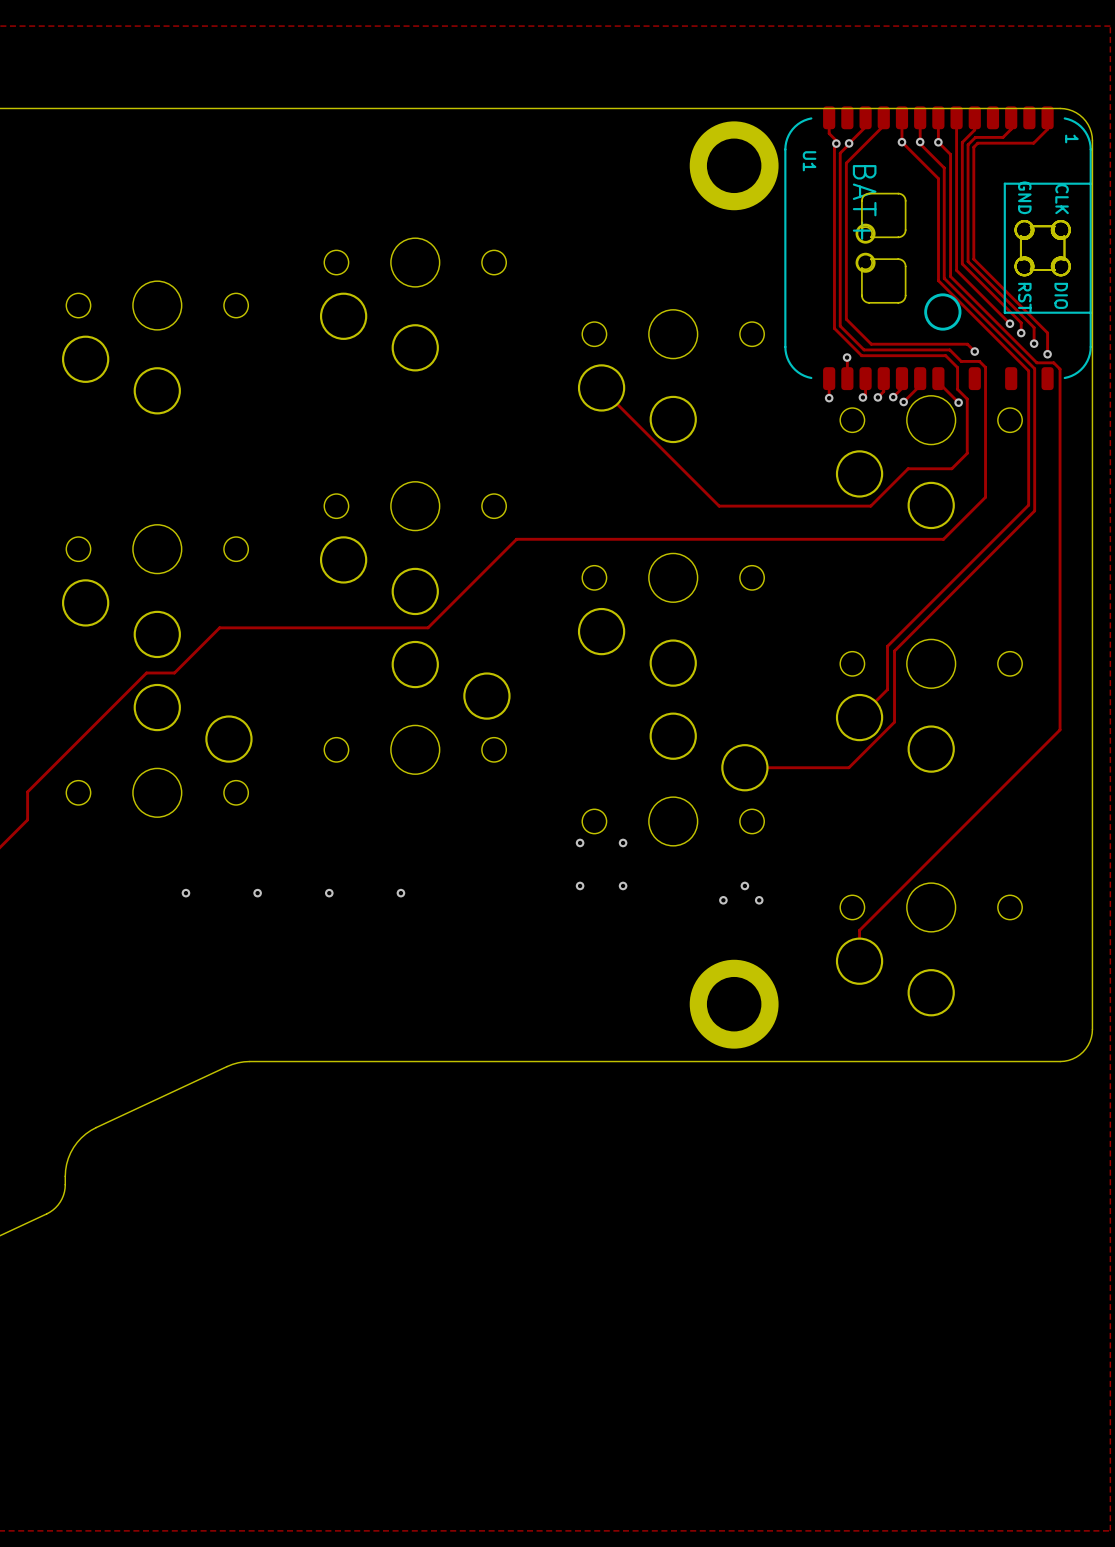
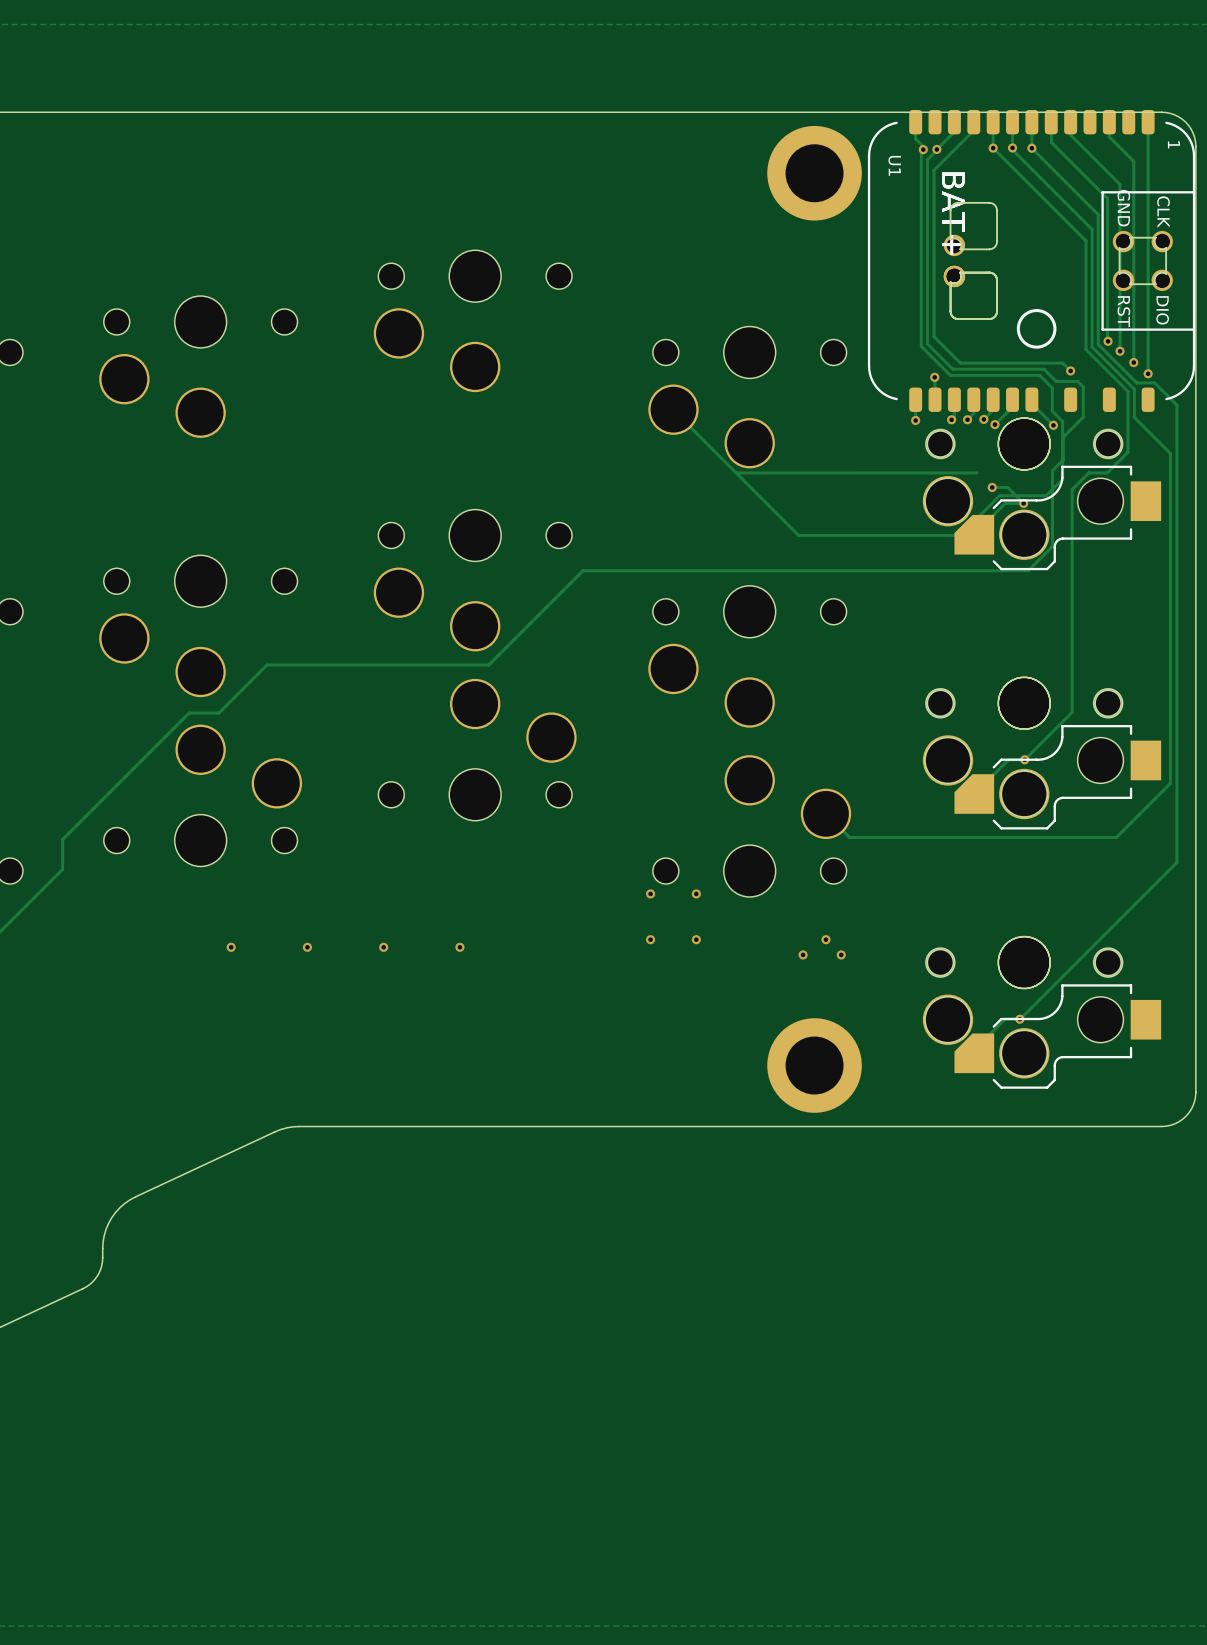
U1 footprint: [784, 106, 1092, 391] -> [867, 109, 1196, 412]
track: (956, 117) (956, 270) (1009, 323) -> (1051, 122) (1051, 142) (1107, 198) (1107, 340)
track: (974, 129) (962, 142) (962, 263) (1021, 322) -> (1070, 135) (1120, 184) (1120, 340)
track: (1011, 129) (1003, 137) (975, 137) (968, 144) (968, 261) (1034, 327) -> (1109, 134) (1109, 136) (1133, 161) (1133, 345)
track: (1047, 129) (1033, 143) (977, 143) (973, 147) (973, 259) (1047, 332) -> (1148, 134) (1148, 351)
track: (950, 154) (950, 276) (1000, 326) -> (1044, 161) (1098, 214) (1098, 344)
track: (944, 167) (944, 278) (994, 329) -> (1038, 175) (1092, 229) (1092, 347)
track: (938, 178) (938, 280) (989, 331) -> (1032, 186) (1086, 240) (1086, 349)
part: none -> (970, 292)
track: (979, 361) (985, 367) (985, 497) (943, 539) (934, 539) -> (1075, 381) (1083, 386) (1083, 417) (1063, 437) (1063, 460) (1052, 470) (1052, 546) (1028, 570)
track: (1060, 369) (1060, 729) (859, 930) (859, 961) -> (1161, 389) (1176, 405) (1176, 862) (1020, 1019) (1005, 1019) (973, 1050)
track: (1034, 395) (1034, 510) (894, 651) (894, 722) (848, 767) (744, 767) -> (1134, 417) (1170, 453) (1170, 783) (1116, 837) (849, 837) (840, 828)
track: (1028, 427) (1028, 505) (887, 646) (887, 689) (859, 717) -> (1128, 452) (1107, 472) (1088, 472) (1072, 489) (1072, 712) (1024, 759) (1008, 759) (974, 794)
track: none -> (736, 472) (976, 472)
track: none -> (992, 487) (1007, 487) (1023, 503) (1005, 503) (973, 535)
via: none -> (992, 487)
part: none -> (1043, 494)
via: none -> (1023, 503)
part: none -> (1043, 753)
via: none -> (1024, 759)
part: none -> (1043, 1012)
via: none -> (1019, 1019)

